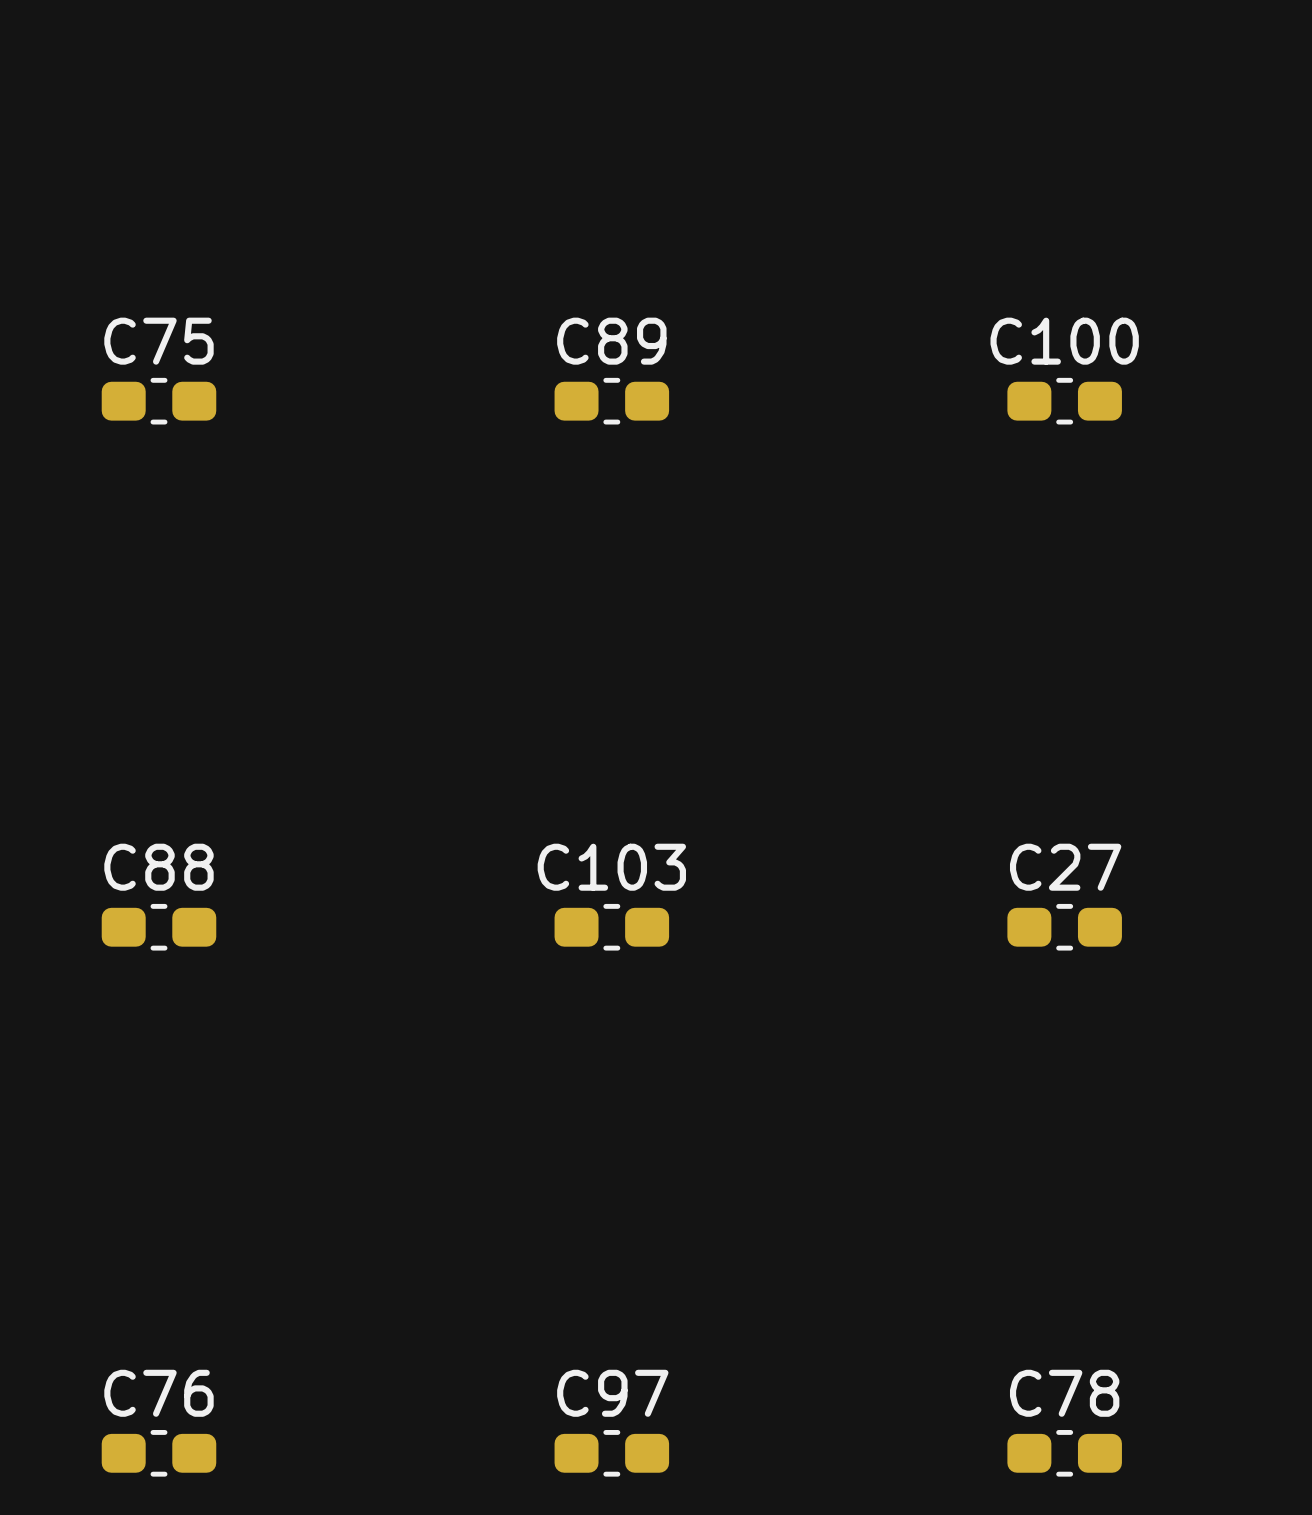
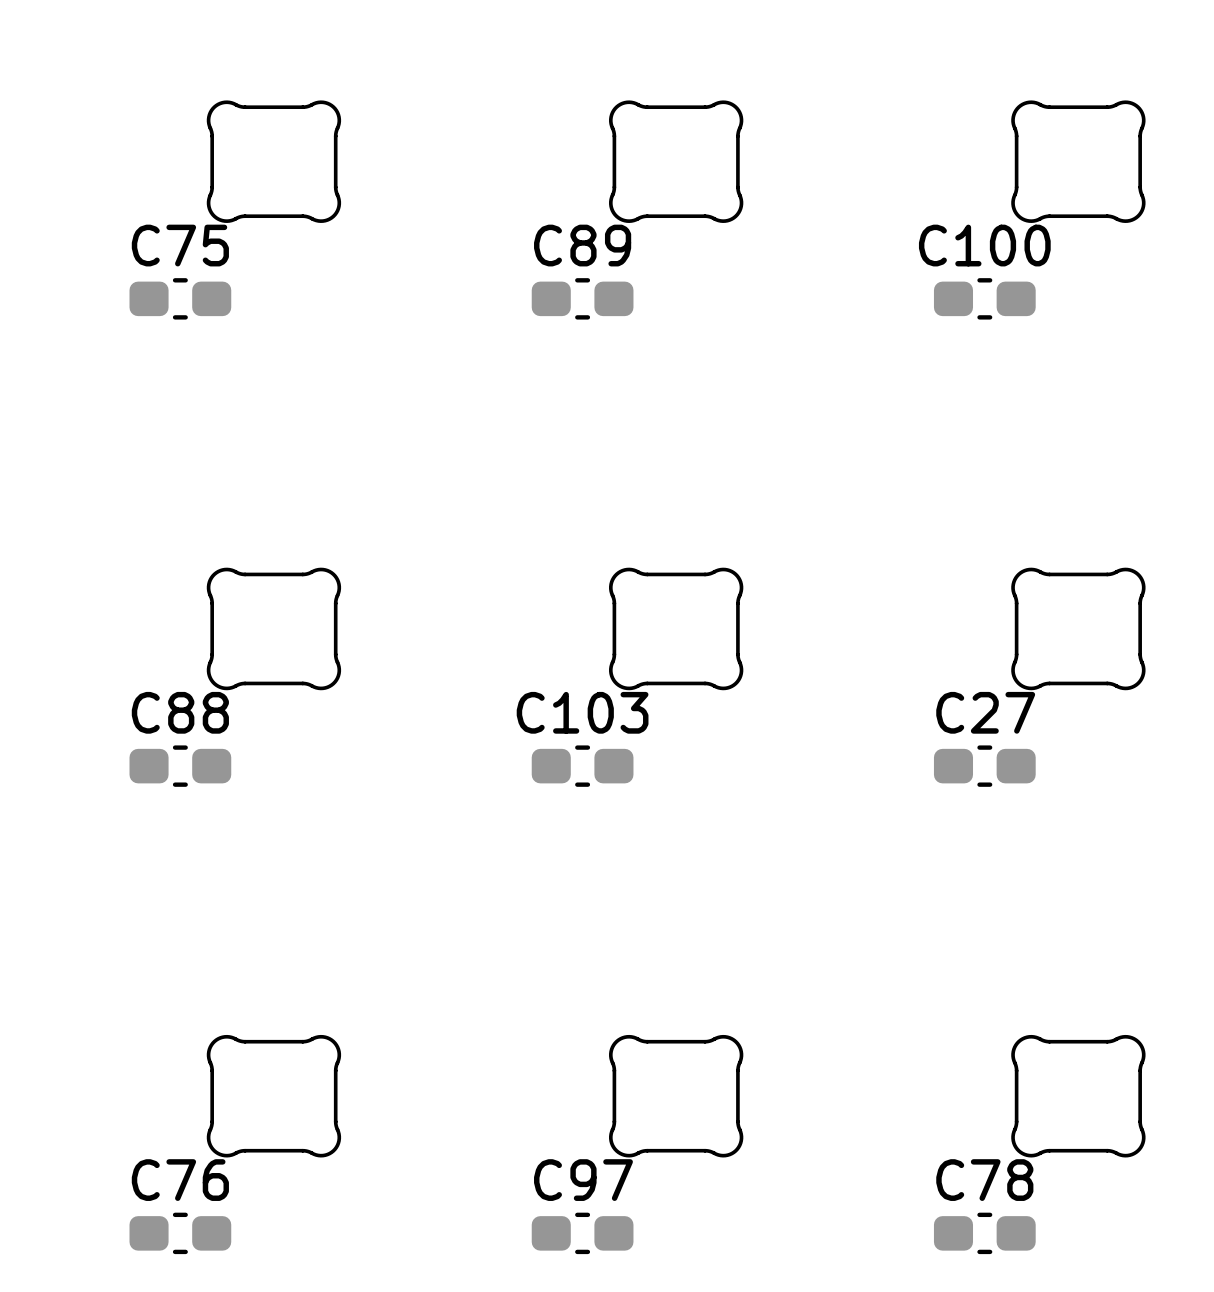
part: none -> (273, 161)
part: none -> (676, 161)
part: none -> (1078, 161)
part: none -> (273, 628)
part: none -> (676, 628)
part: none -> (1078, 628)
part: none -> (273, 1096)
part: none -> (676, 1096)
part: none -> (1078, 1096)

